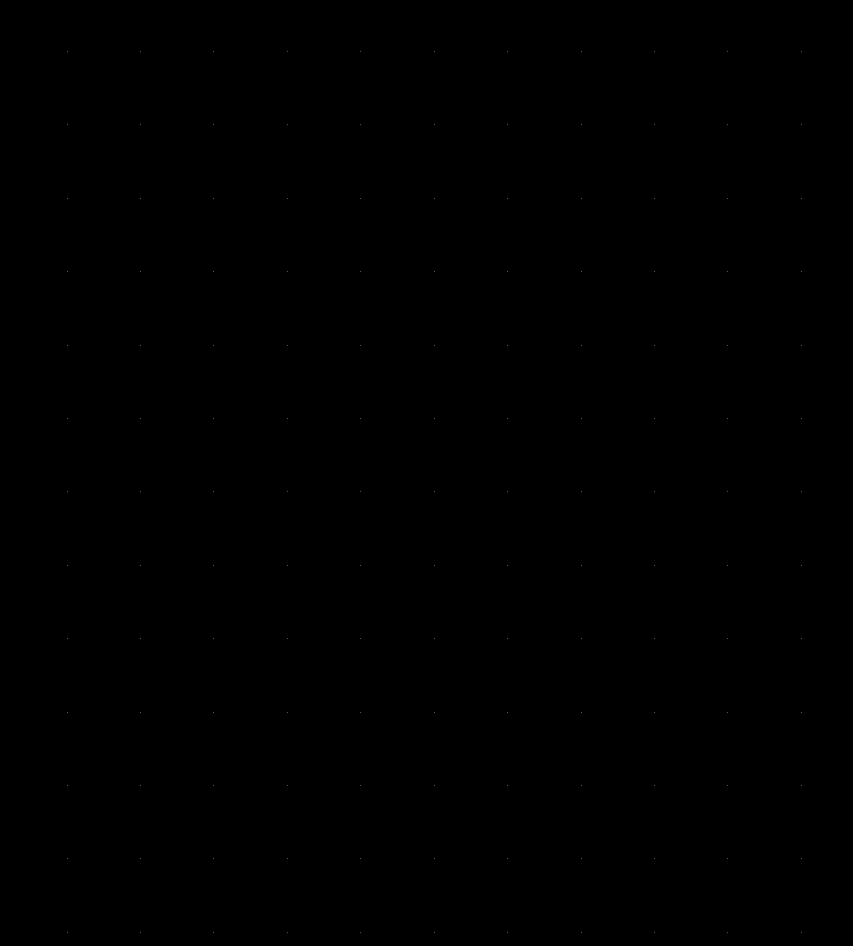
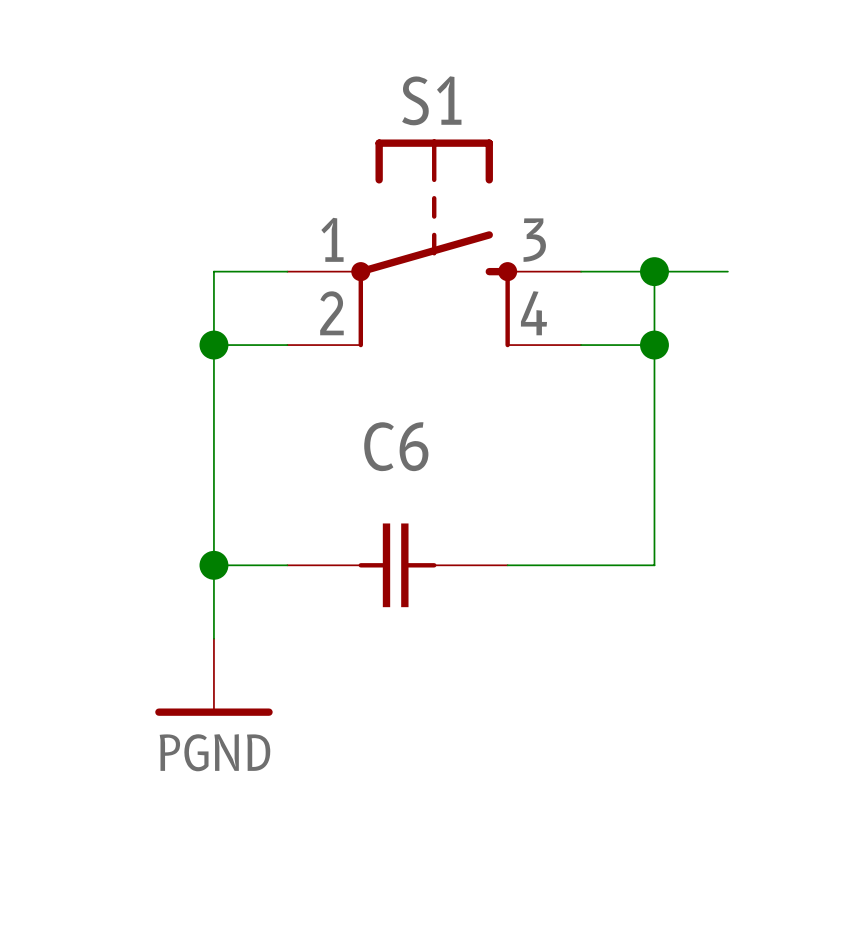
S1: none -> (434, 243)
wire: none -> (287, 271) (213, 271) (213, 638)
wire: none -> (581, 271) (727, 271)
wire: none -> (654, 271) (654, 565) (507, 565)
junction: none -> (654, 271)
wire: none -> (213, 345) (287, 345)
junction: none -> (213, 345)
wire: none -> (581, 345) (654, 345)
junction: none -> (654, 345)
wire: none -> (213, 565) (287, 565)
junction: none -> (213, 565)
C6: none -> (397, 565)
power symbol: none -> PGND (213, 677)

